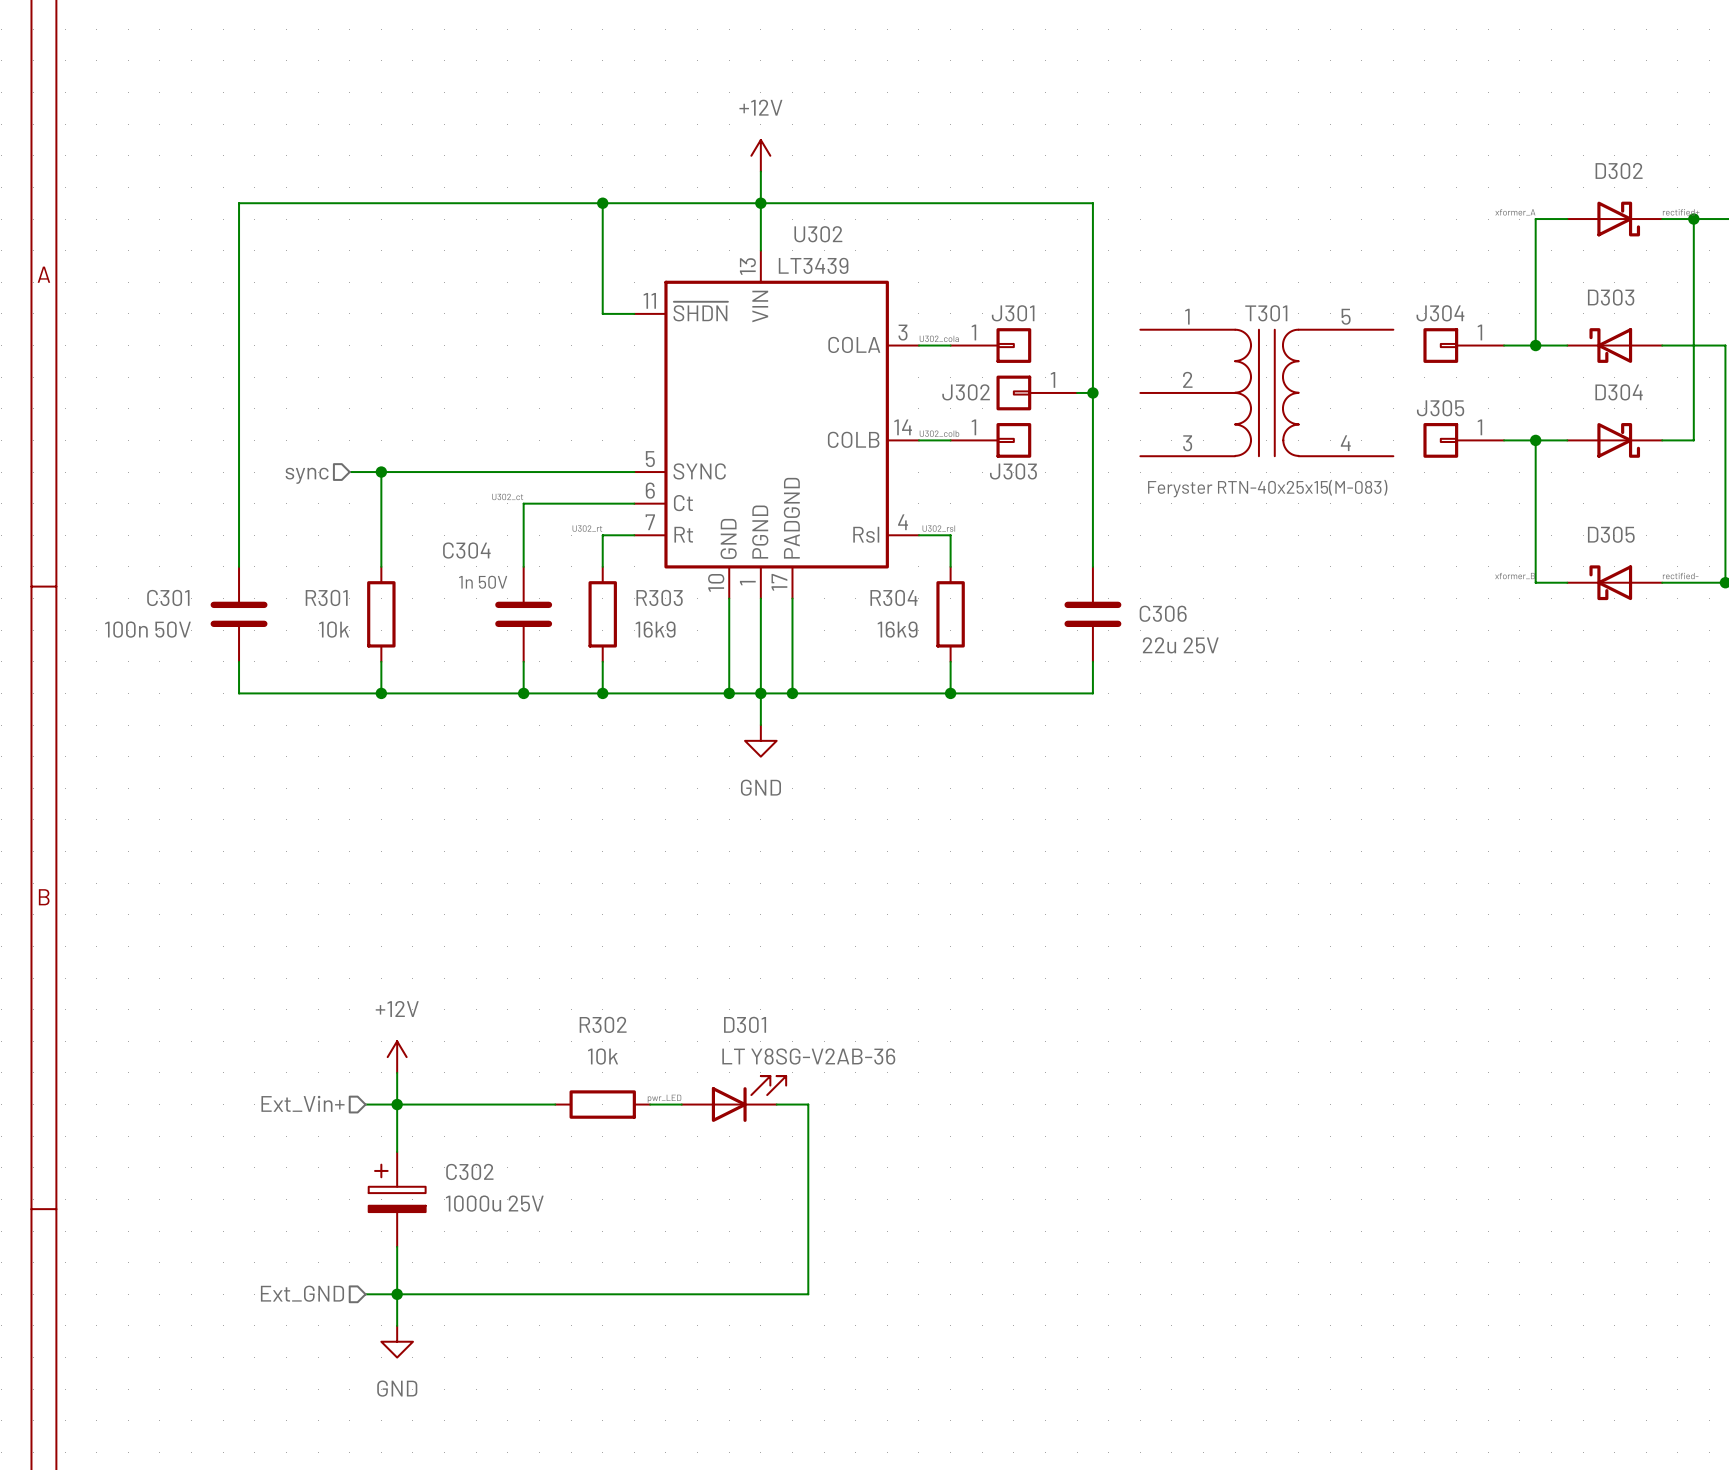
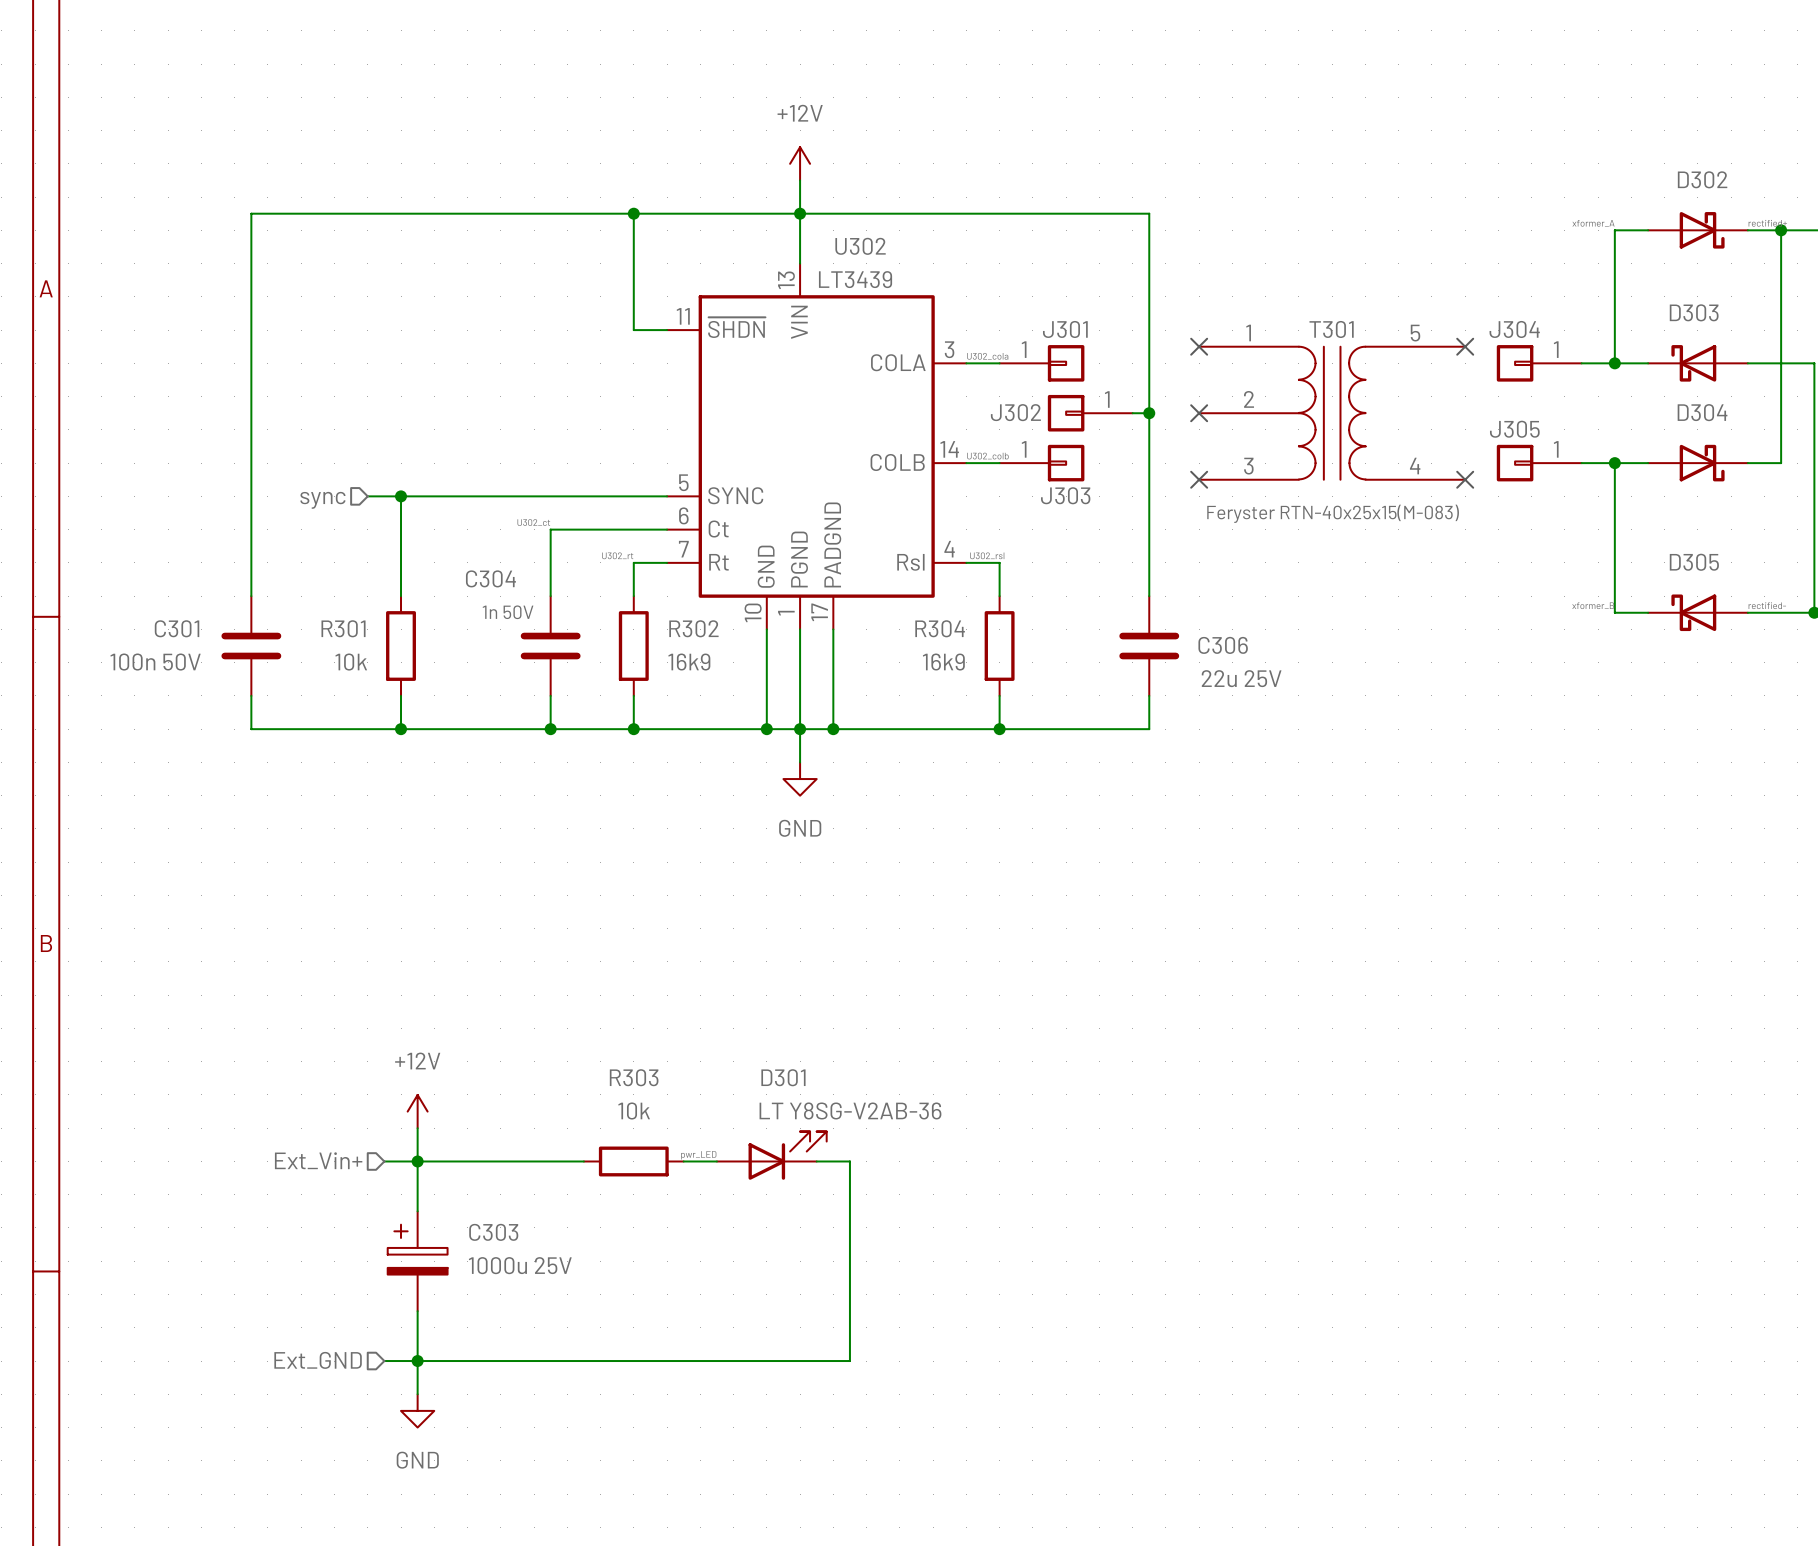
no-connect mark: none -> (1199, 346)
no-connect mark: none -> (1465, 346)
no-connect mark: none -> (1199, 413)
no-connect mark: none -> (1199, 479)
no-connect mark: none -> (1465, 479)
R303 name: R303 (659, 597) -> R302 (693, 628)
R302 name: R302 (603, 1024) -> R303 (634, 1077)
C302 name: C302 (469, 1171) -> C303 (493, 1232)

